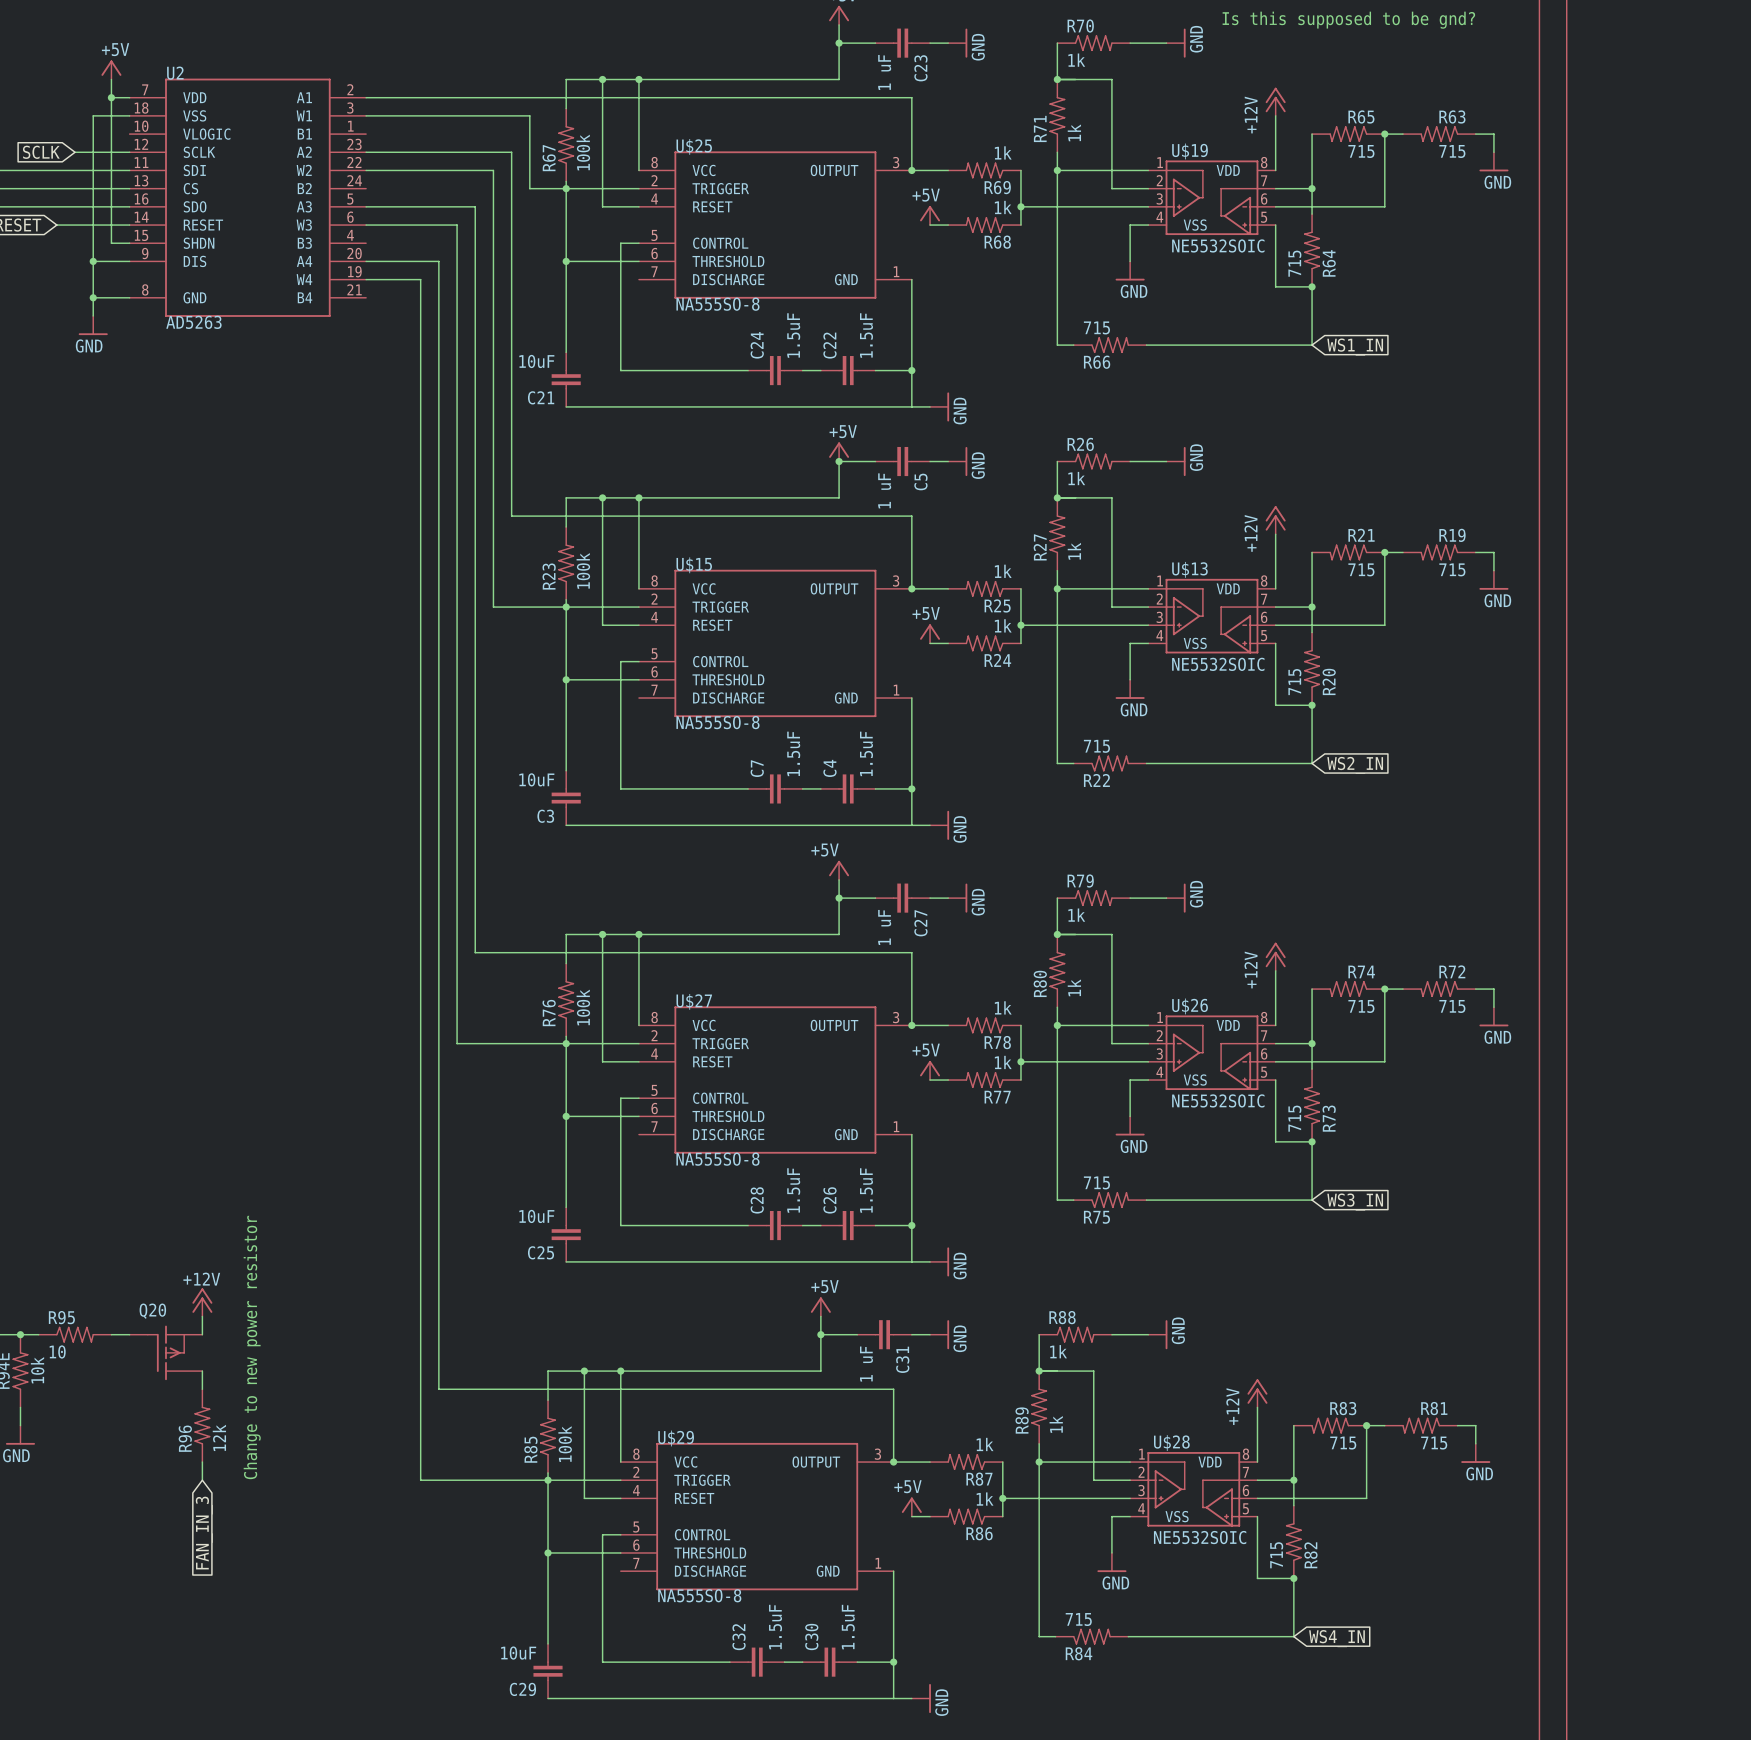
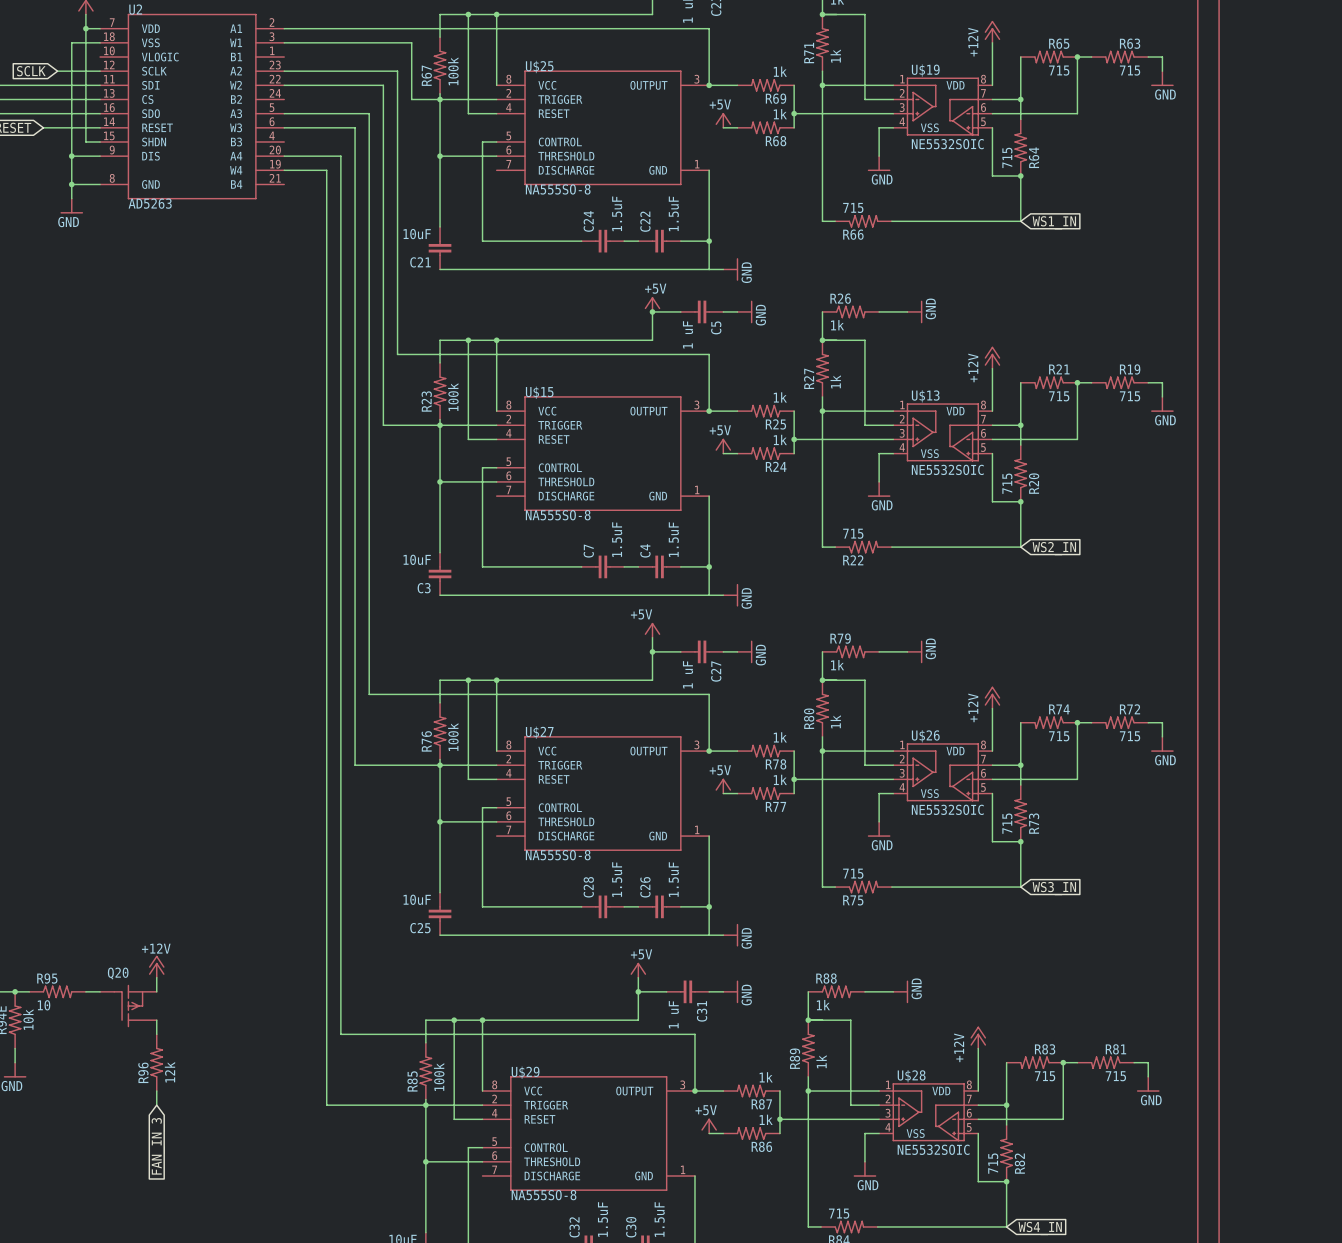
text: Change to new power resistor (252, 1347) -> none

